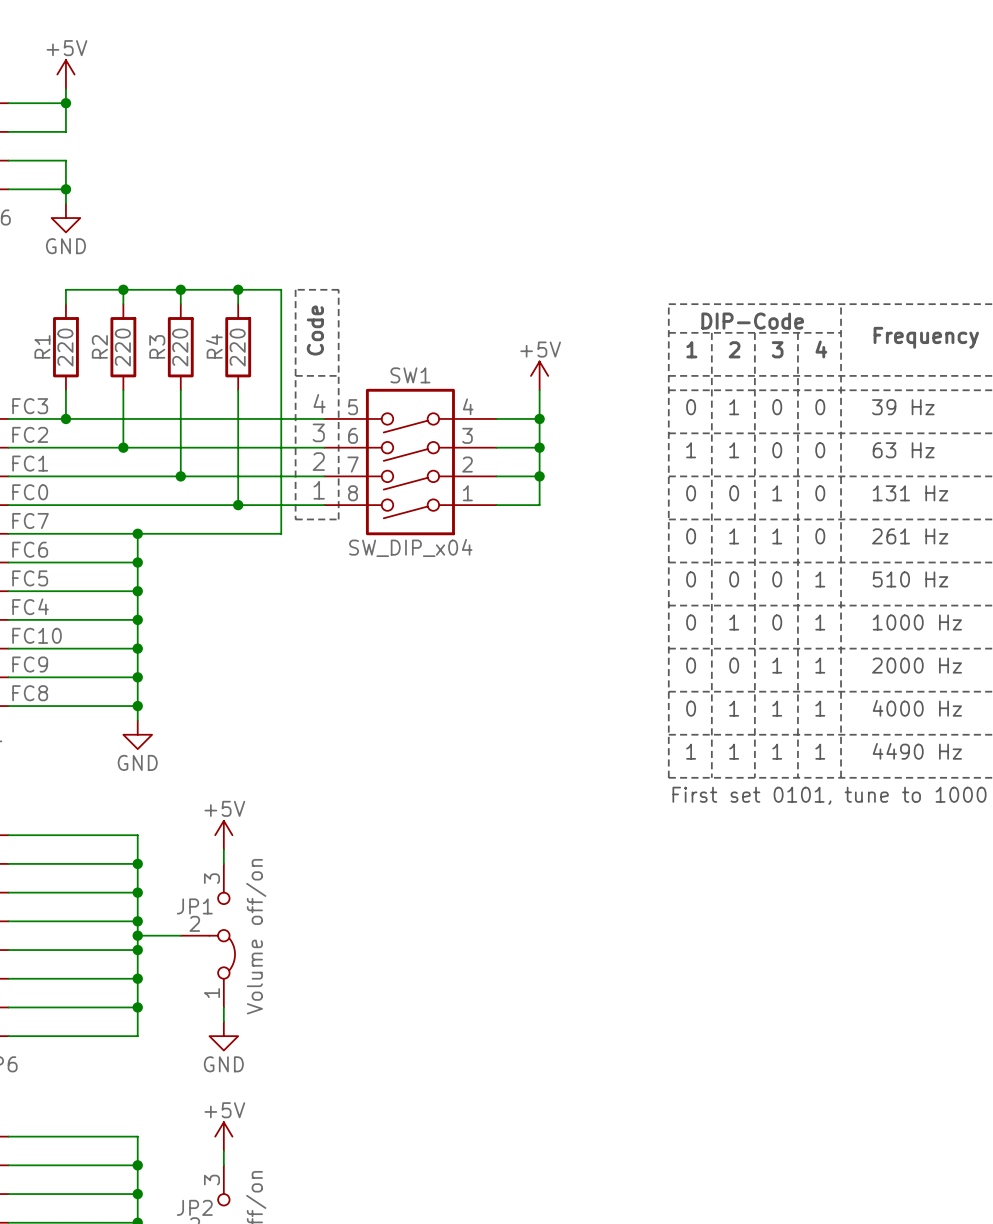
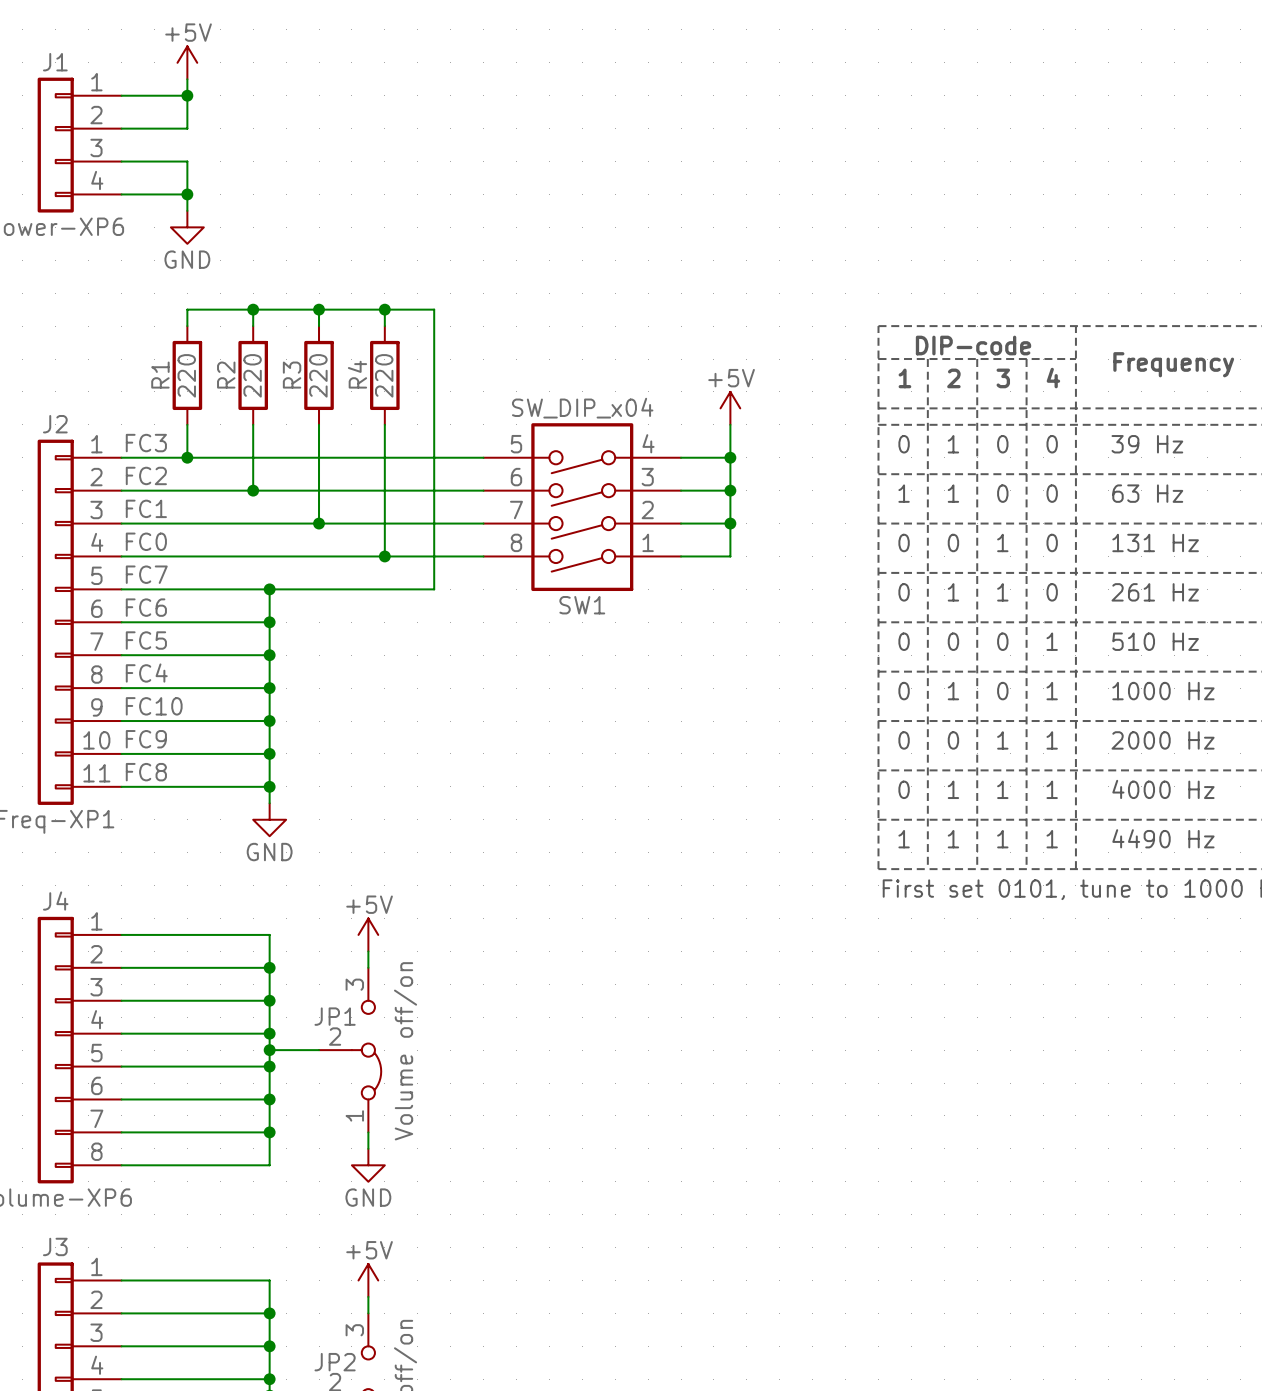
line: (295, 289) (295, 519) (338, 519) (338, 289) (295, 289) -> none
text: DIP-Code (752, 321) -> DIP-code (973, 345)
text: Code (315, 330) -> none
line: (295, 375) (338, 375) -> none
SW1 name position: SW1 (410, 375) -> SW1 (582, 605)
label: 4 (319, 403) -> none
label: 3 (318, 432) -> none
label: 2 (318, 461) -> none
label: 1 (319, 490) -> none
SW1 value position: SW_DIP_x04 (410, 547) -> SW_DIP_x04 (582, 408)

